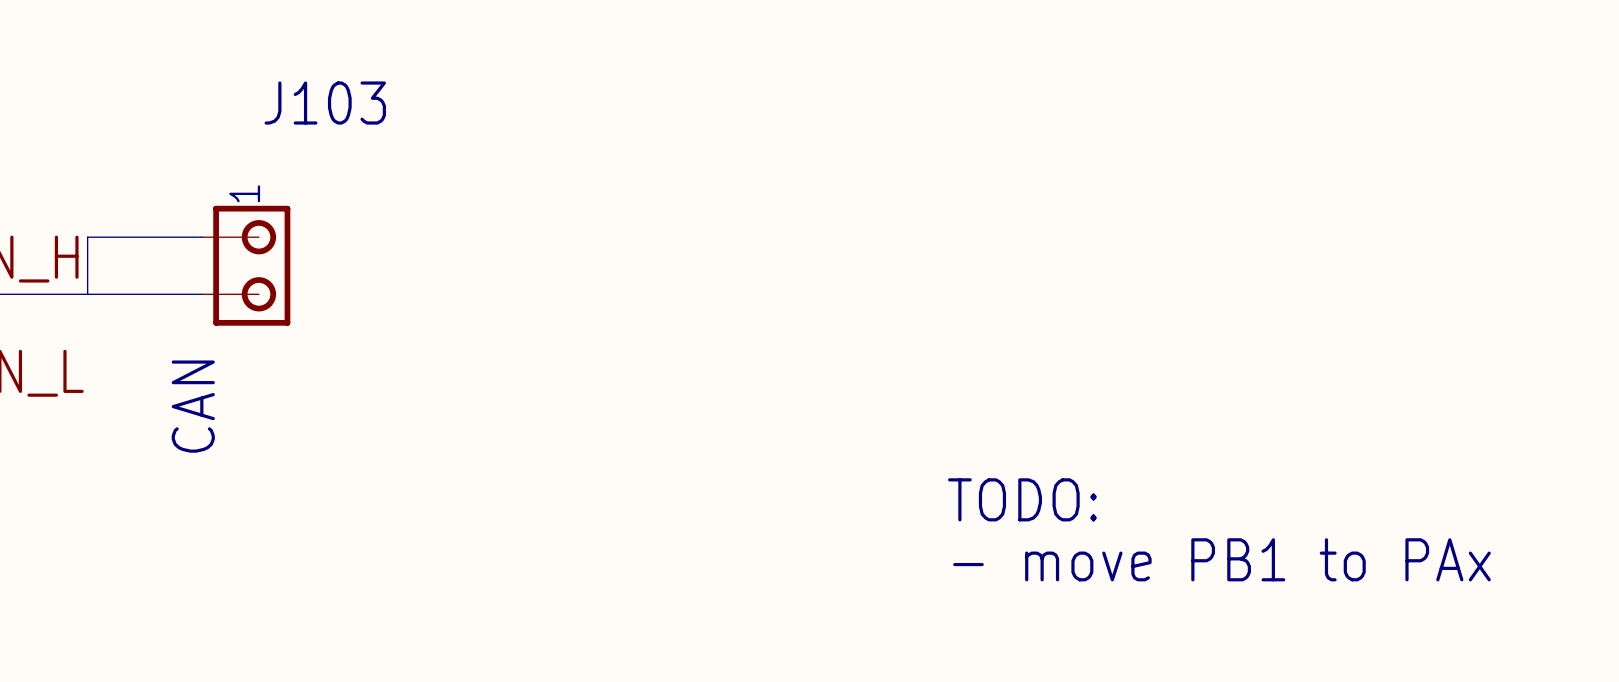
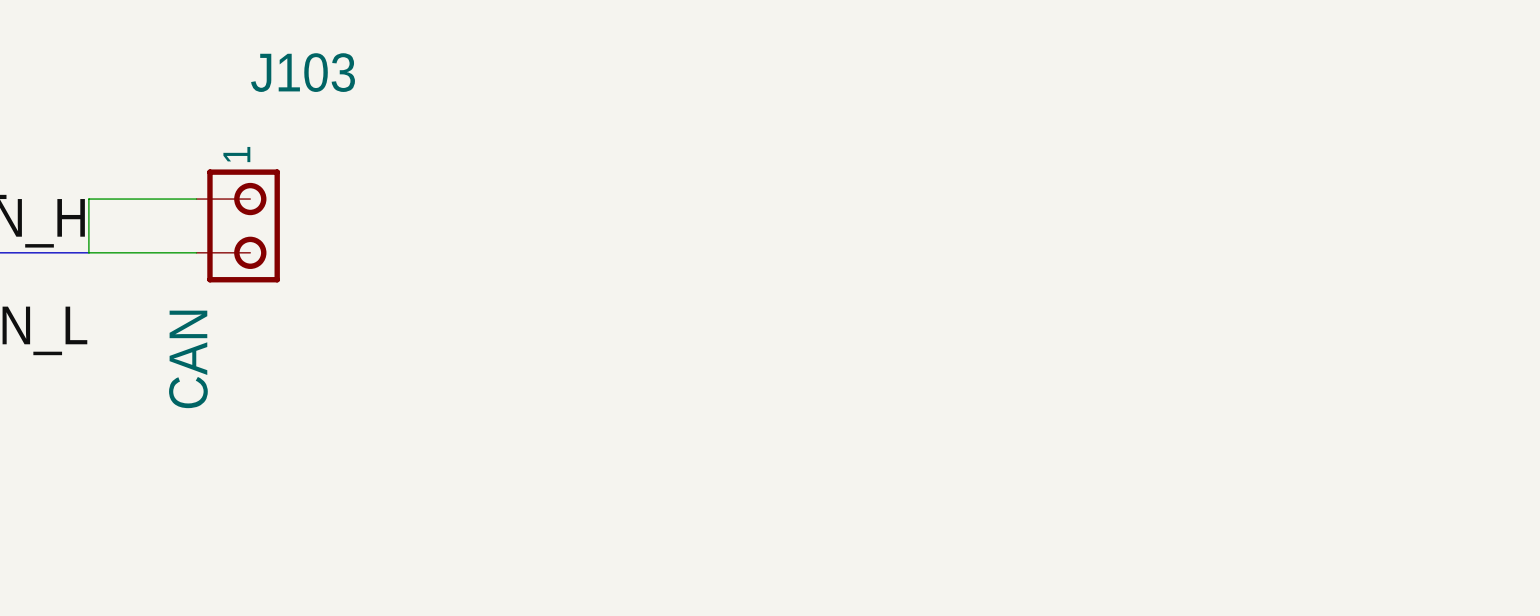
text: TODO: (1022, 499) -> none
text: - move PB1 to PAx (1221, 559) -> none

